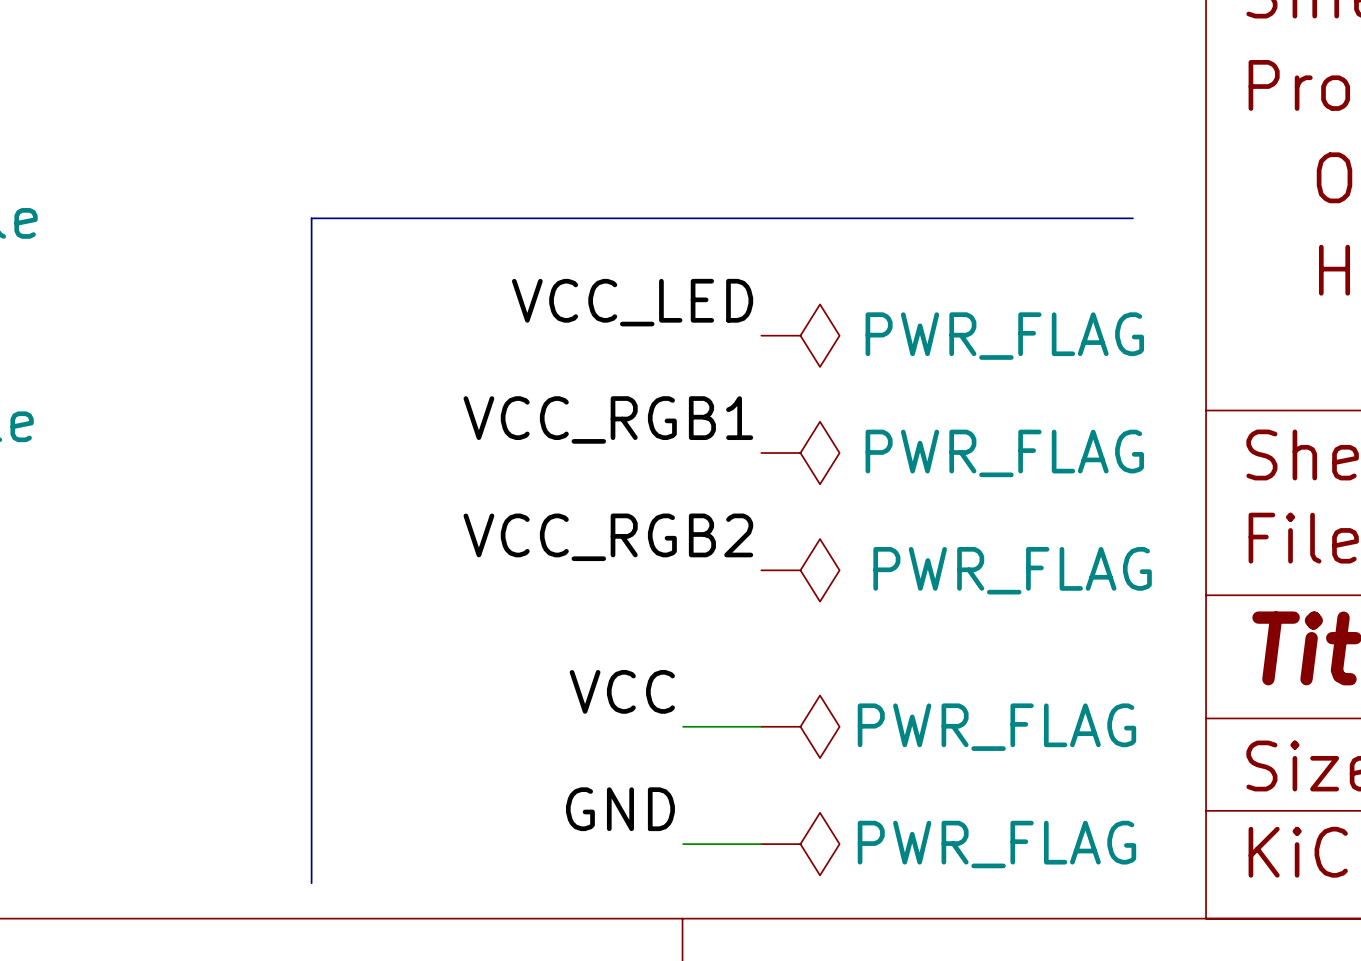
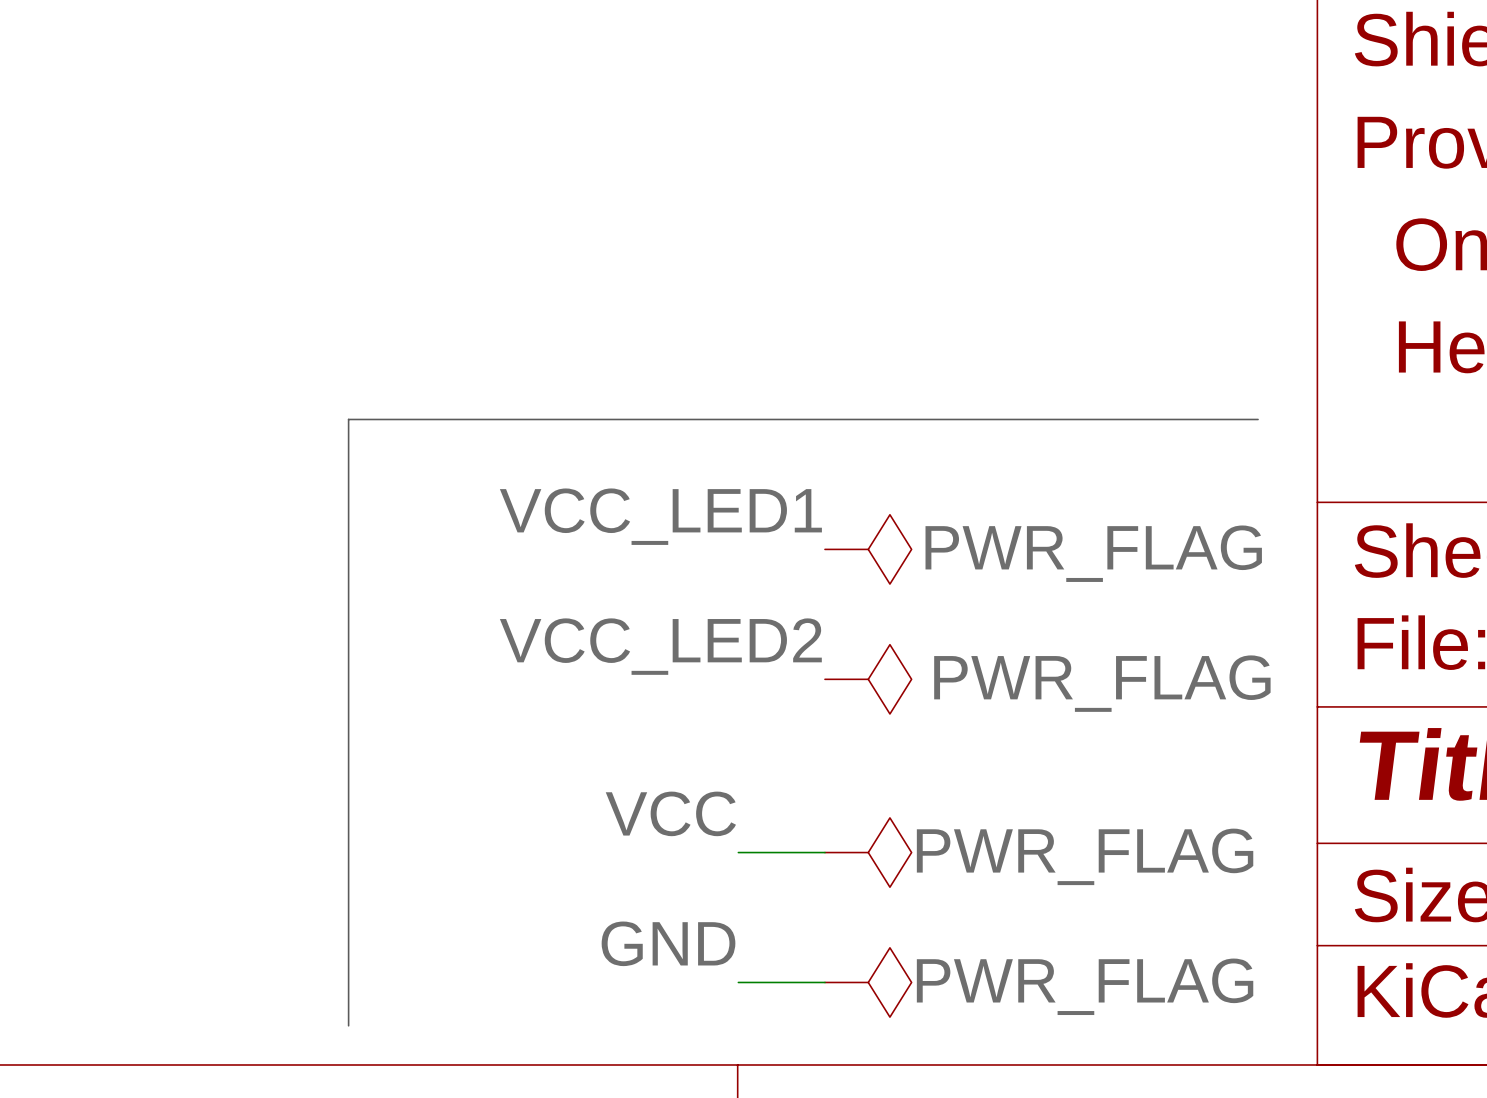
line: (1132, 218) (311, 218) (311, 883) -> none
label: VCC_LED (632, 302) -> none
power symbol: PWR_FLAG (800, 335) -> none
line: none -> (1258, 419) (348, 419) (348, 1025)
label: VCC_RGB1 (608, 419) -> VCC_LED1 (660, 516)
label: VCC_RGB2 (608, 537) -> VCC_LED2 (660, 646)

